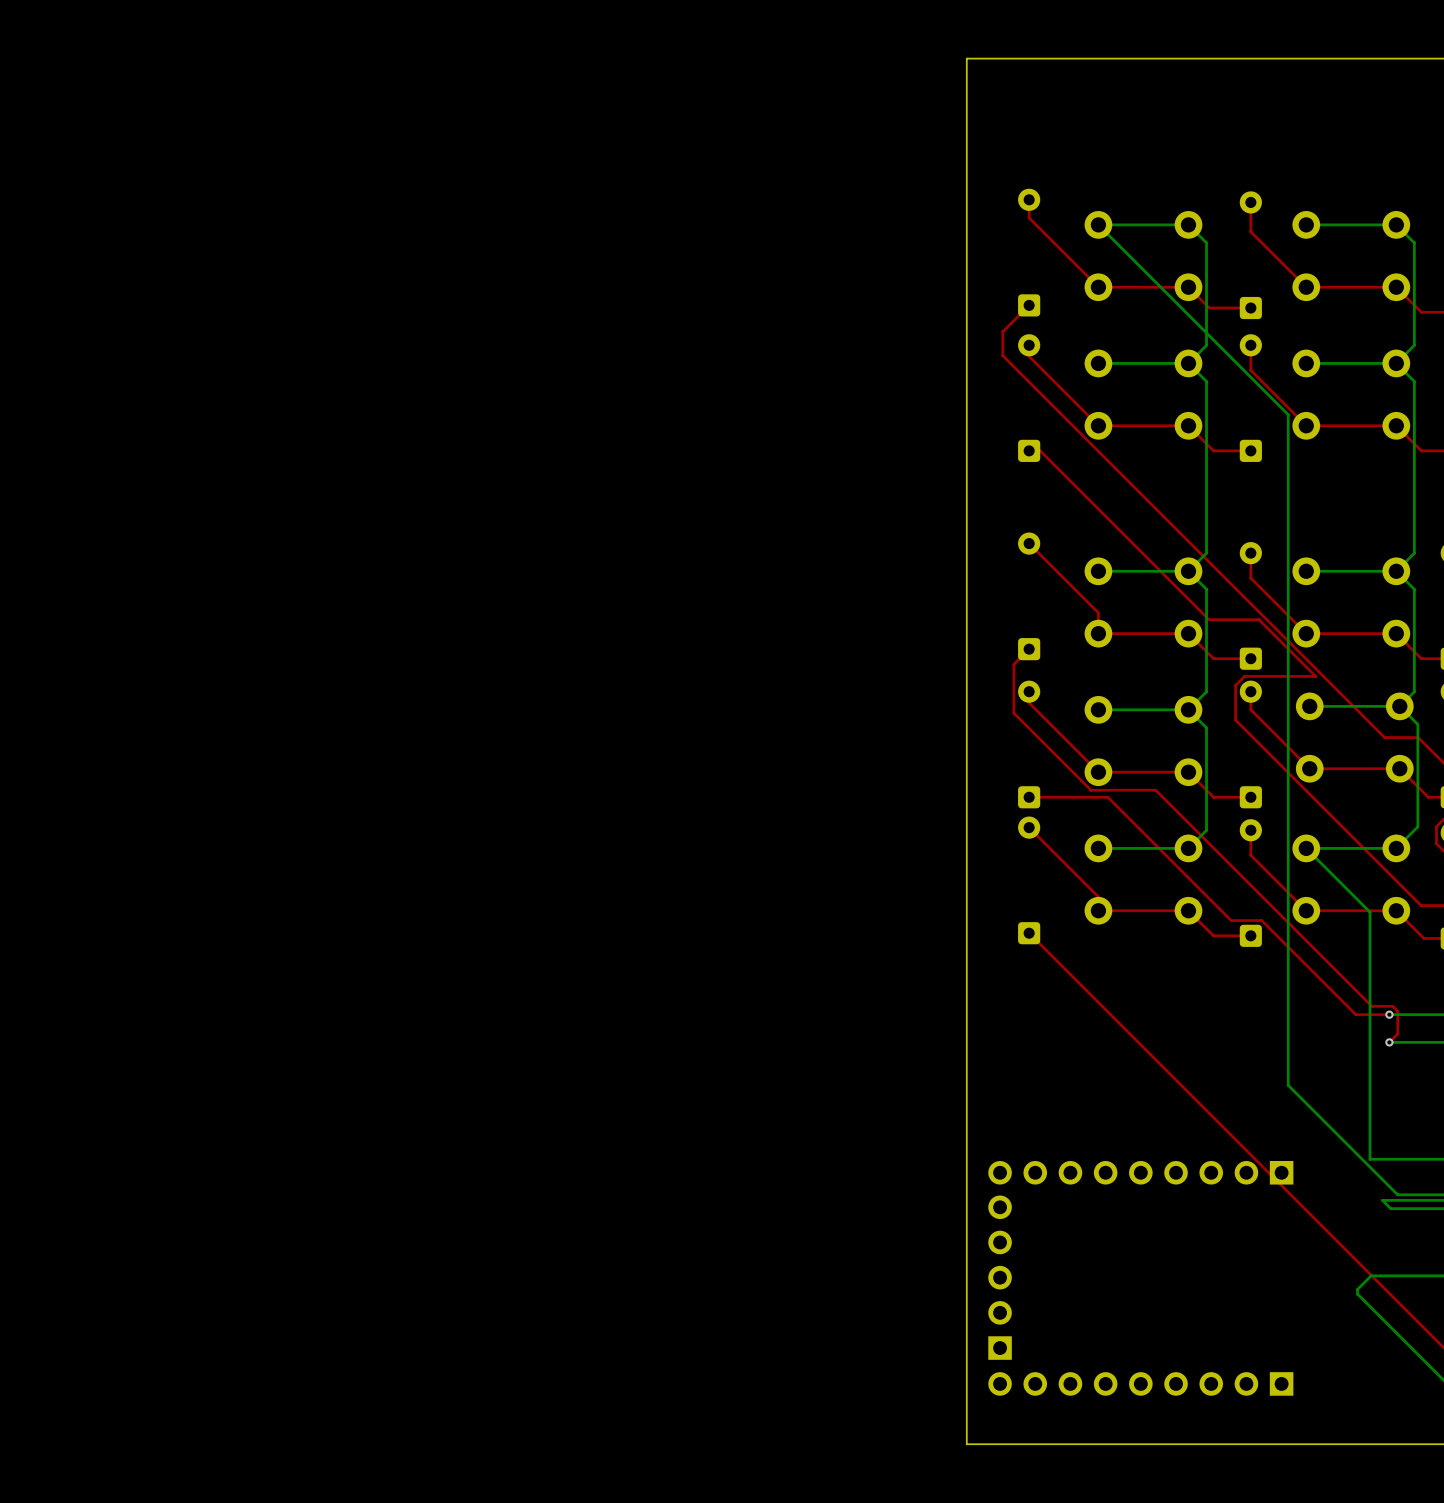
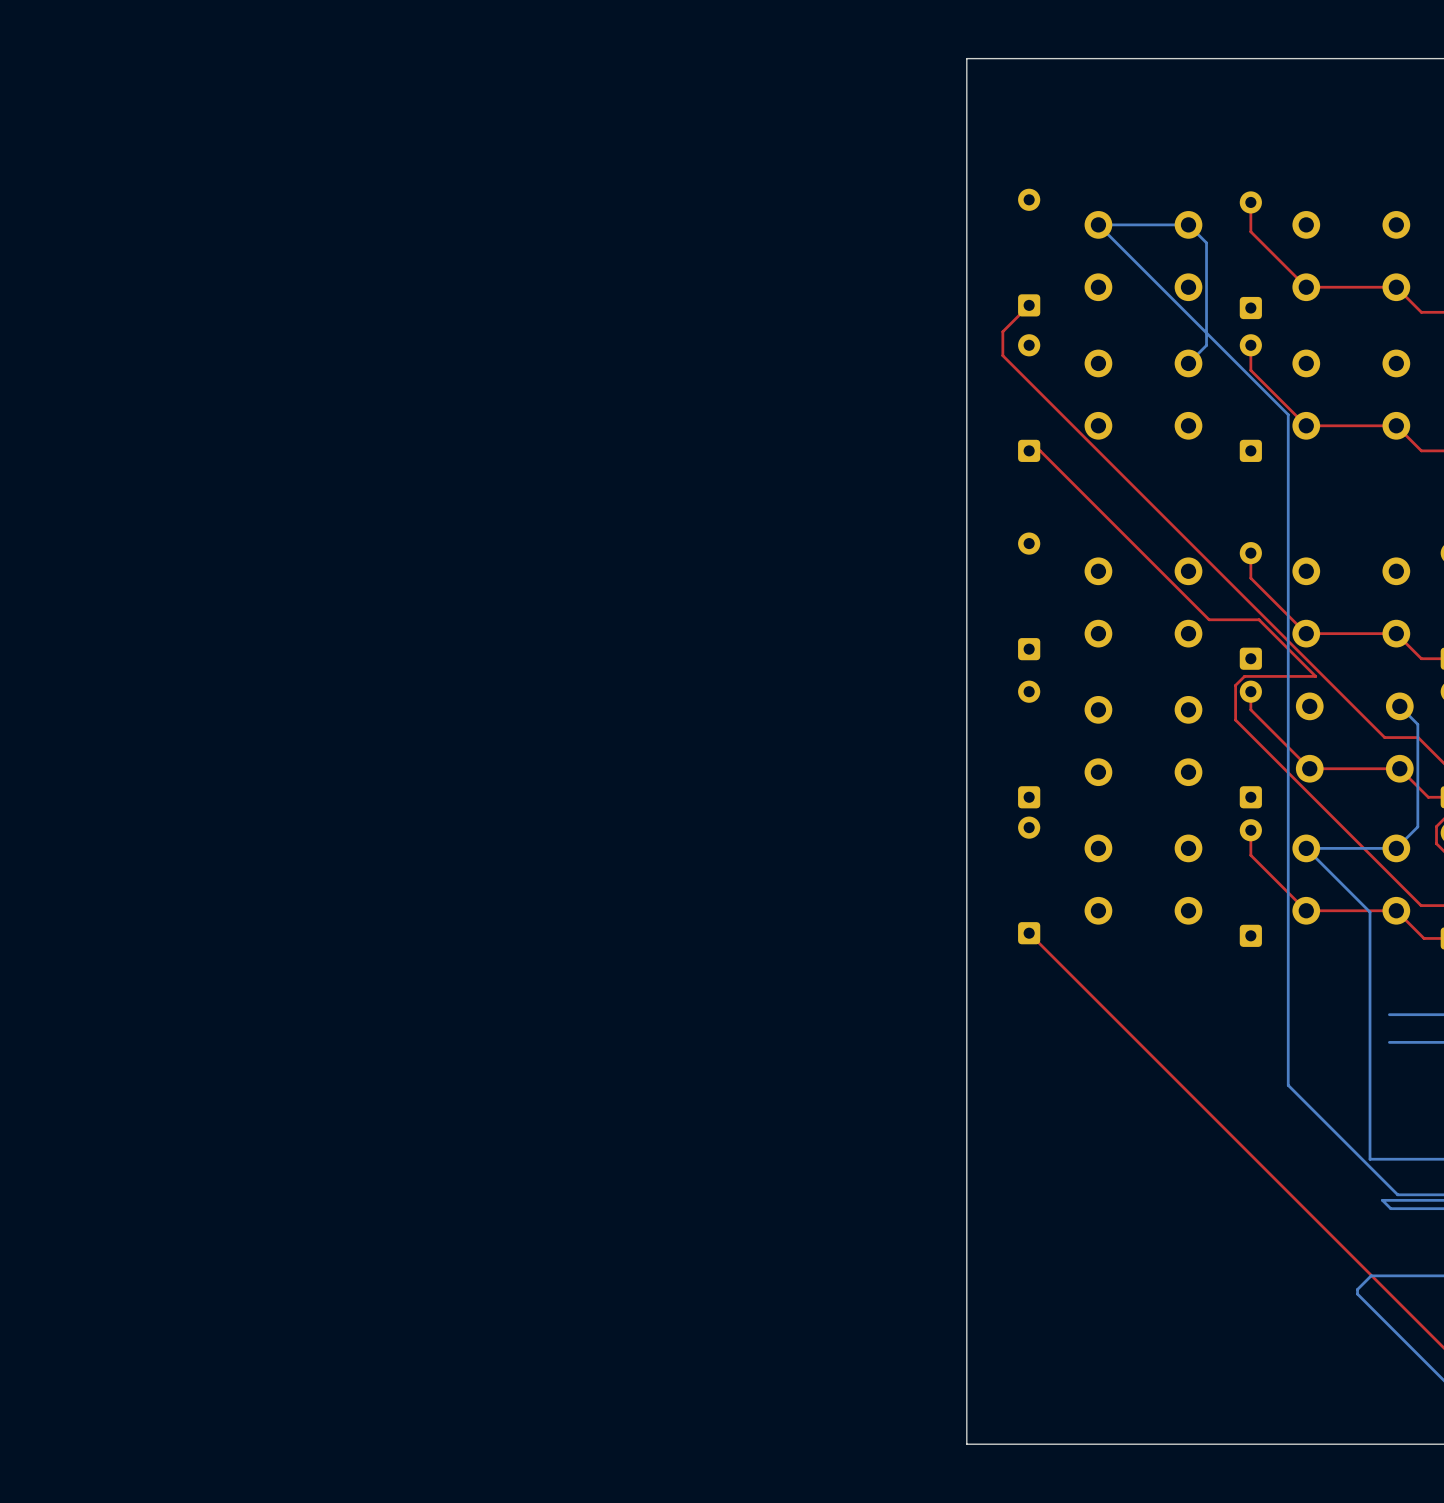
top track: (1029, 199) (1029, 217) (1098, 287) (1188, 287) (1209, 308) (1250, 308) -> none
bottom track: (1306, 224) (1396, 224) (1414, 242) (1414, 345) (1396, 363) -> none
top track: (1029, 345) (1029, 356) (1098, 425) (1188, 425) (1213, 450) (1250, 450) -> none
bottom track: (1098, 363) (1188, 363) (1206, 381) (1206, 553) (1188, 571) -> none
bottom track: (1396, 363) (1306, 363) -> none
bottom track: (1396, 363) (1414, 381) (1414, 553) (1396, 571) -> none
top track: (1029, 543) (1098, 612) (1098, 633) (1188, 633) (1213, 658) (1250, 658) -> none
bottom track: (1188, 571) (1098, 571) -> none
bottom track: (1188, 571) (1206, 589) (1206, 691) (1188, 709) -> none
bottom track: (1396, 571) (1306, 571) -> none
bottom track: (1396, 571) (1414, 589) (1414, 691) (1399, 706) (1309, 706) -> none
top track: (1029, 649) (1013, 664) (1013, 713) (1090, 790) (1155, 790) (1371, 1006) (1392, 1006) (1397, 1011) (1397, 1034) (1389, 1042) -> none
top track: (1029, 691) (1029, 702) (1098, 772) (1188, 772) (1213, 797) (1250, 797) -> none
bottom track: (1188, 709) (1098, 709) -> none
bottom track: (1188, 709) (1206, 727) (1206, 830) (1188, 848) (1098, 848) -> none
top track: (1029, 797) (1107, 797) (1231, 920) (1261, 920) (1355, 1014) (1389, 1014) -> none
top track: (1029, 827) (1098, 896) (1098, 910) (1188, 910) (1213, 935) (1250, 935) -> none
via: (1389, 1014) -> none
via: (1389, 1042) -> none
part: (1140, 1278) -> none

